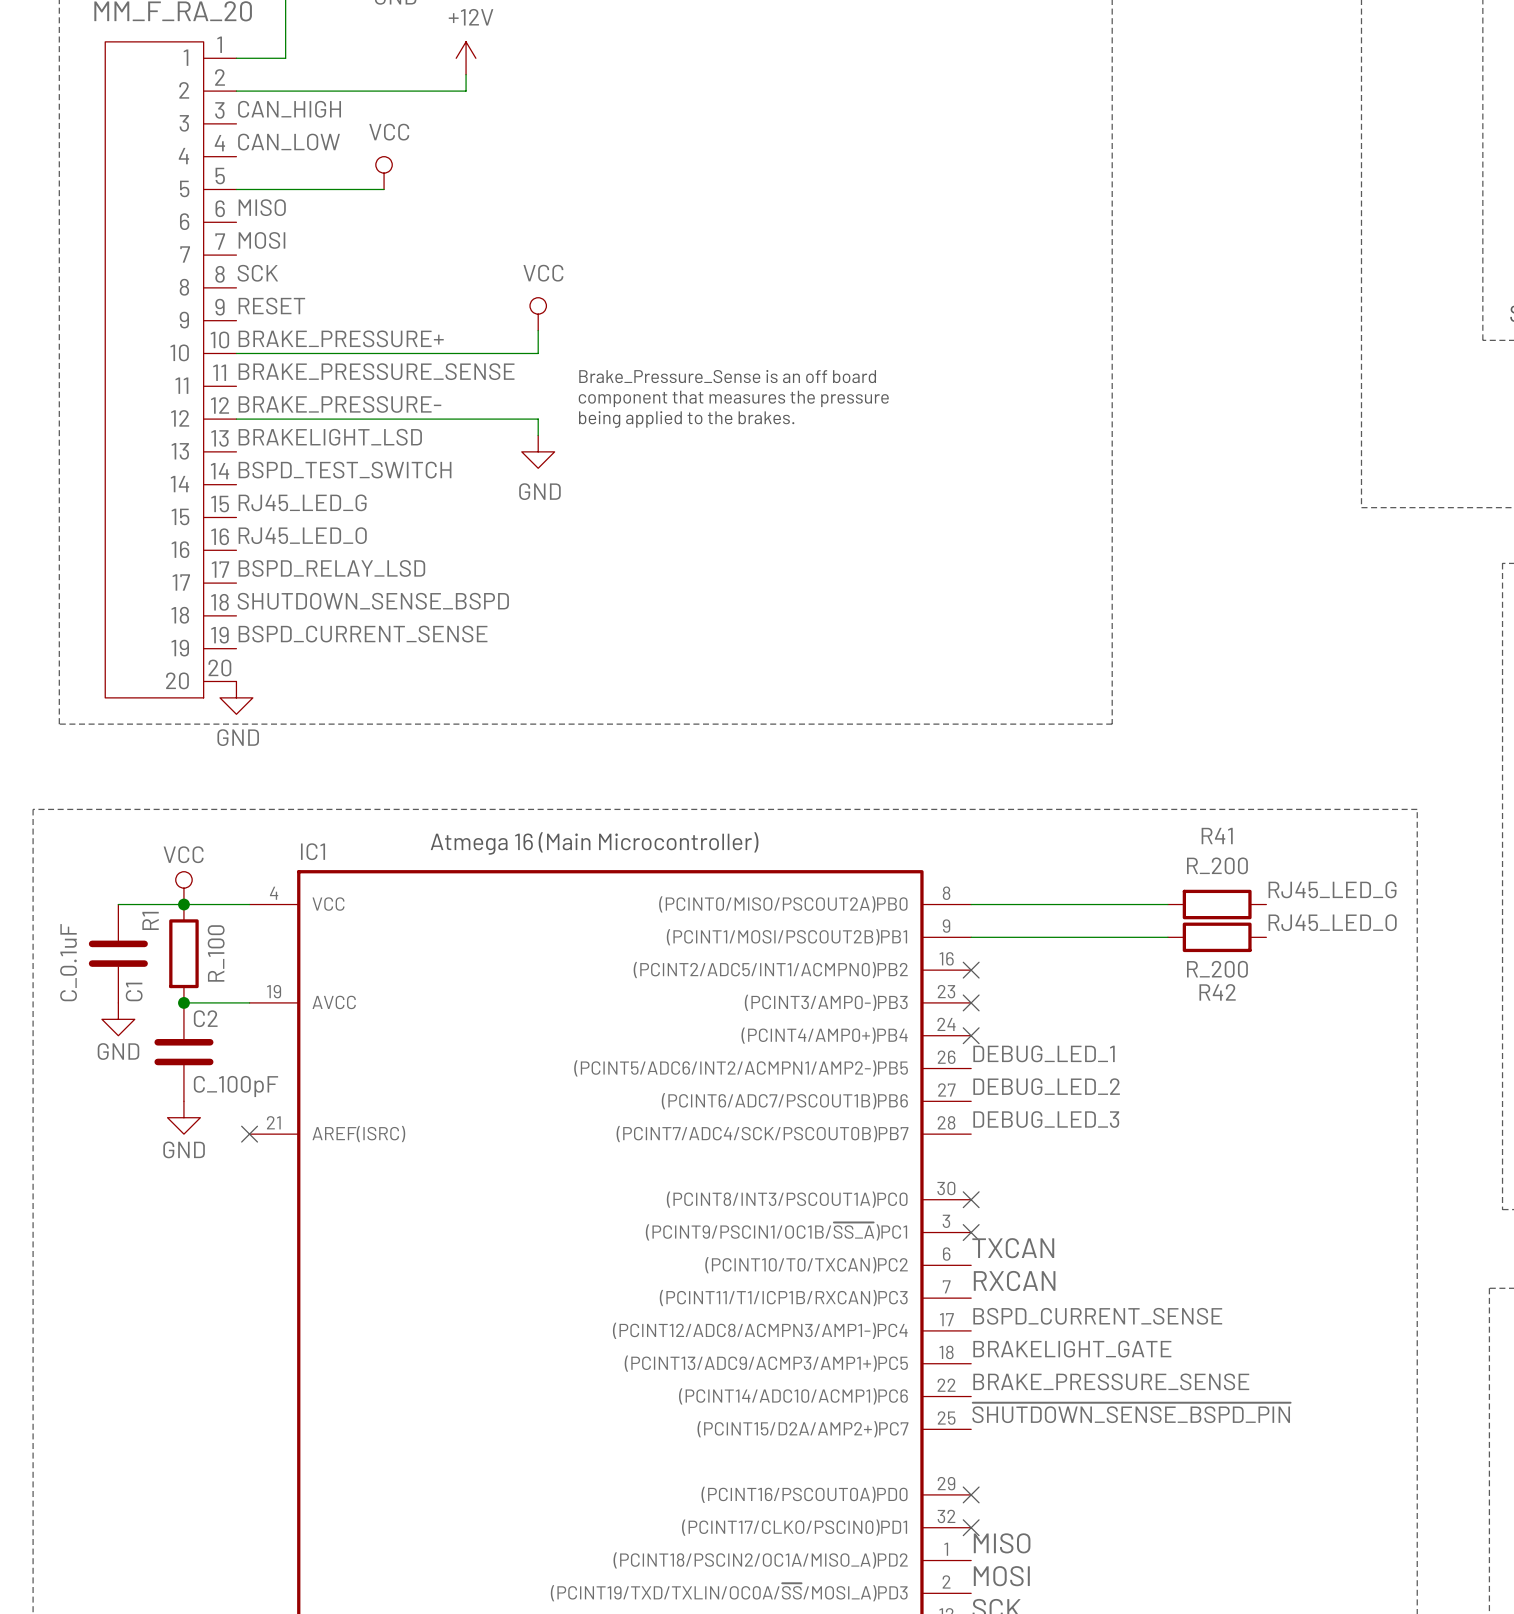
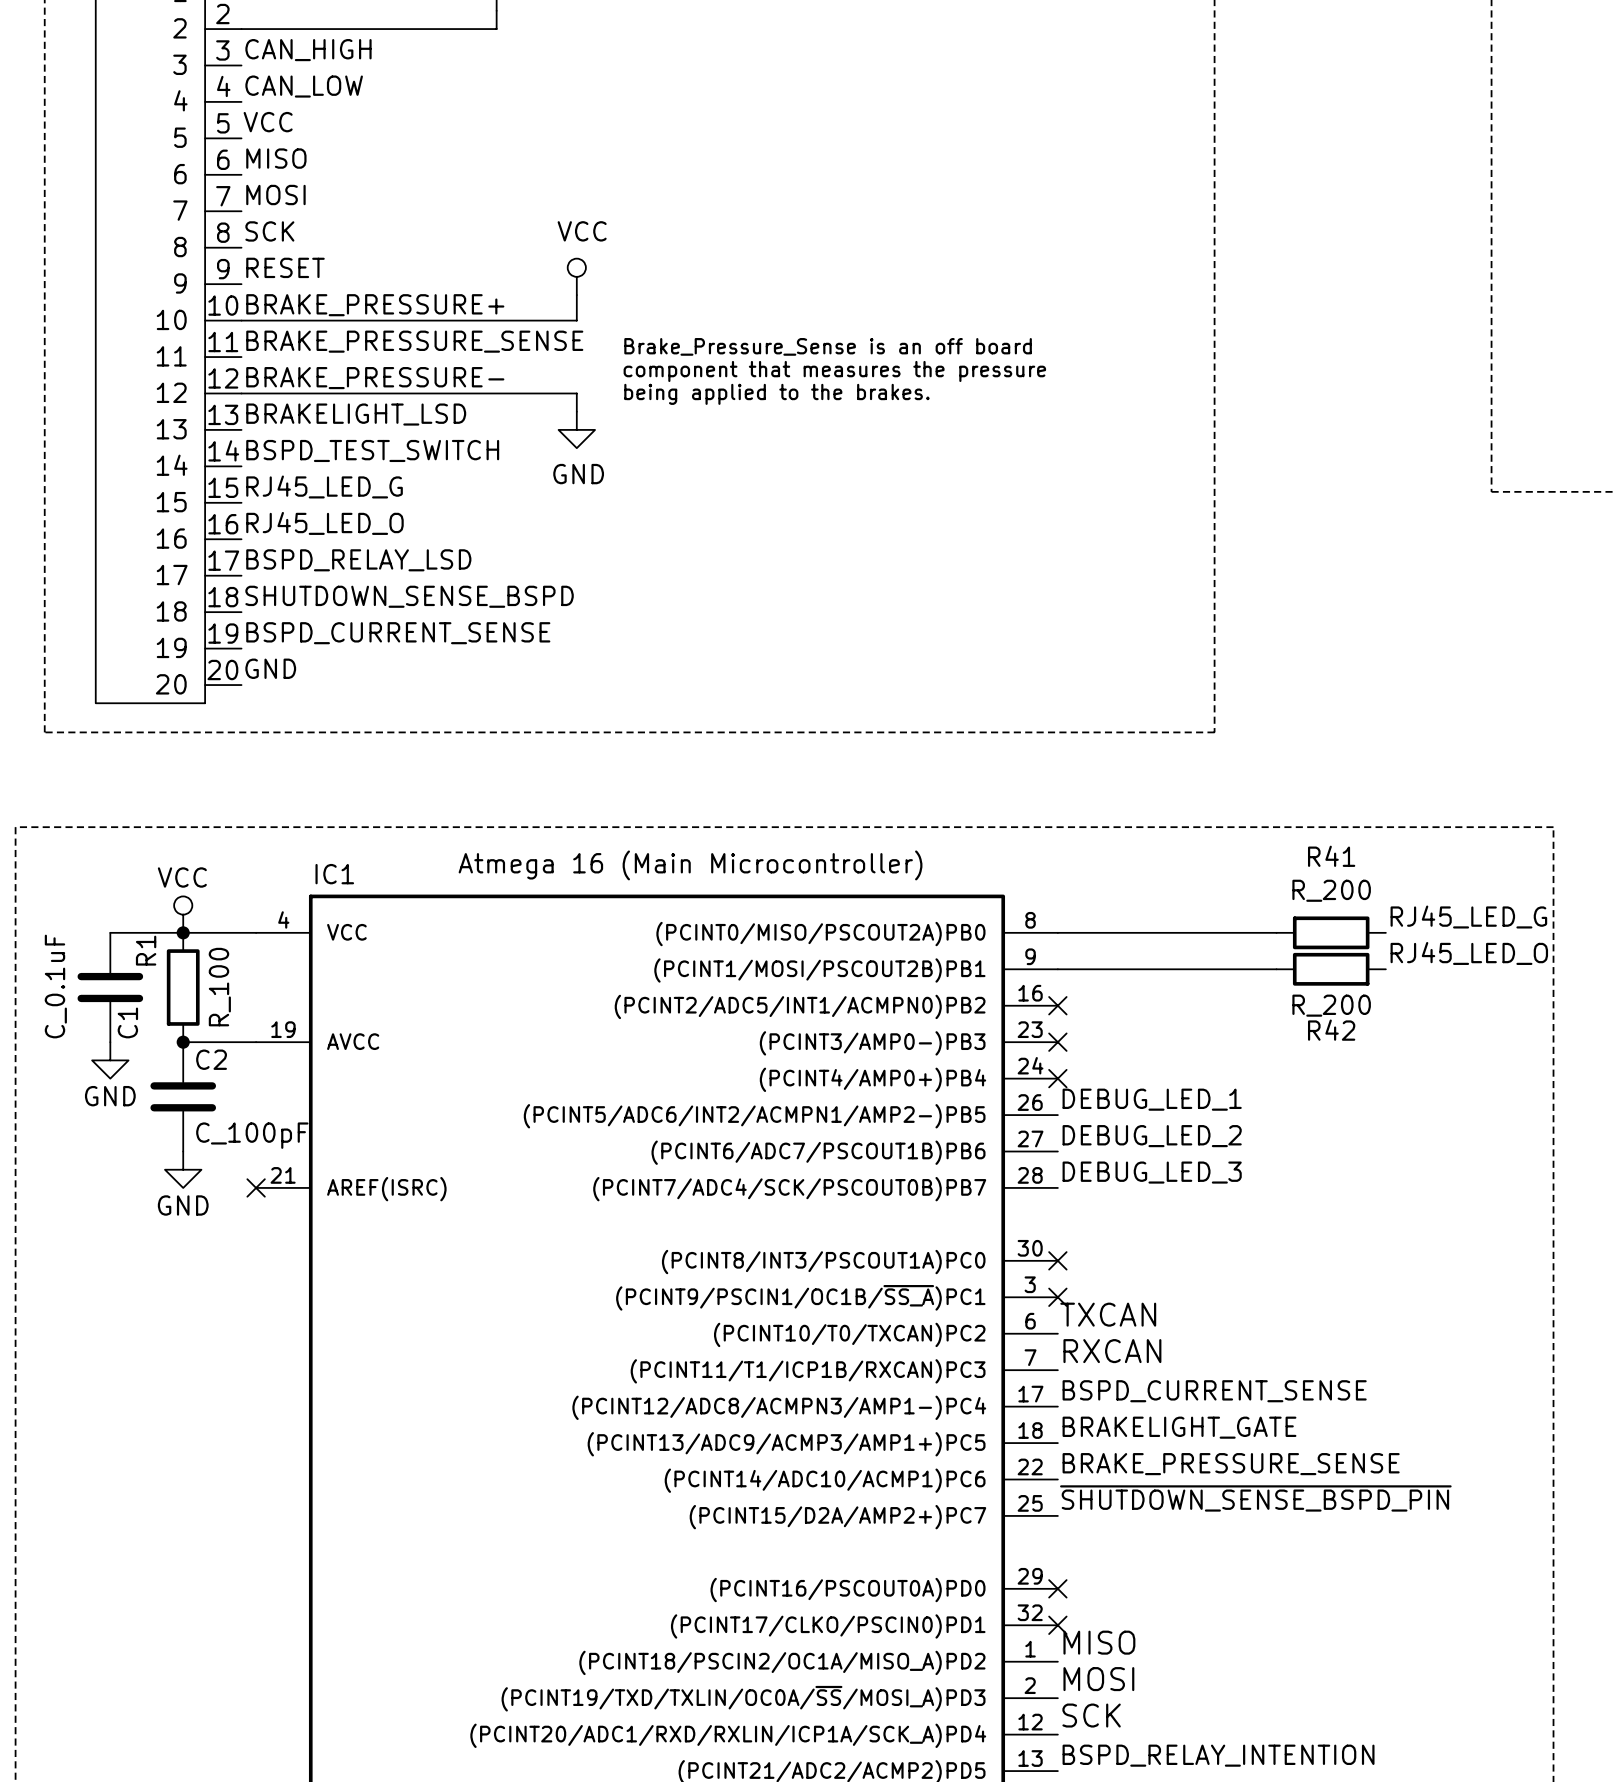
power symbol: VCC (384, 173) -> none
label: none -> VCC (268, 122)
wire: (236, 189) (384, 189) -> none
label: none -> GND (270, 668)
power symbol: GND (236, 697) -> none

